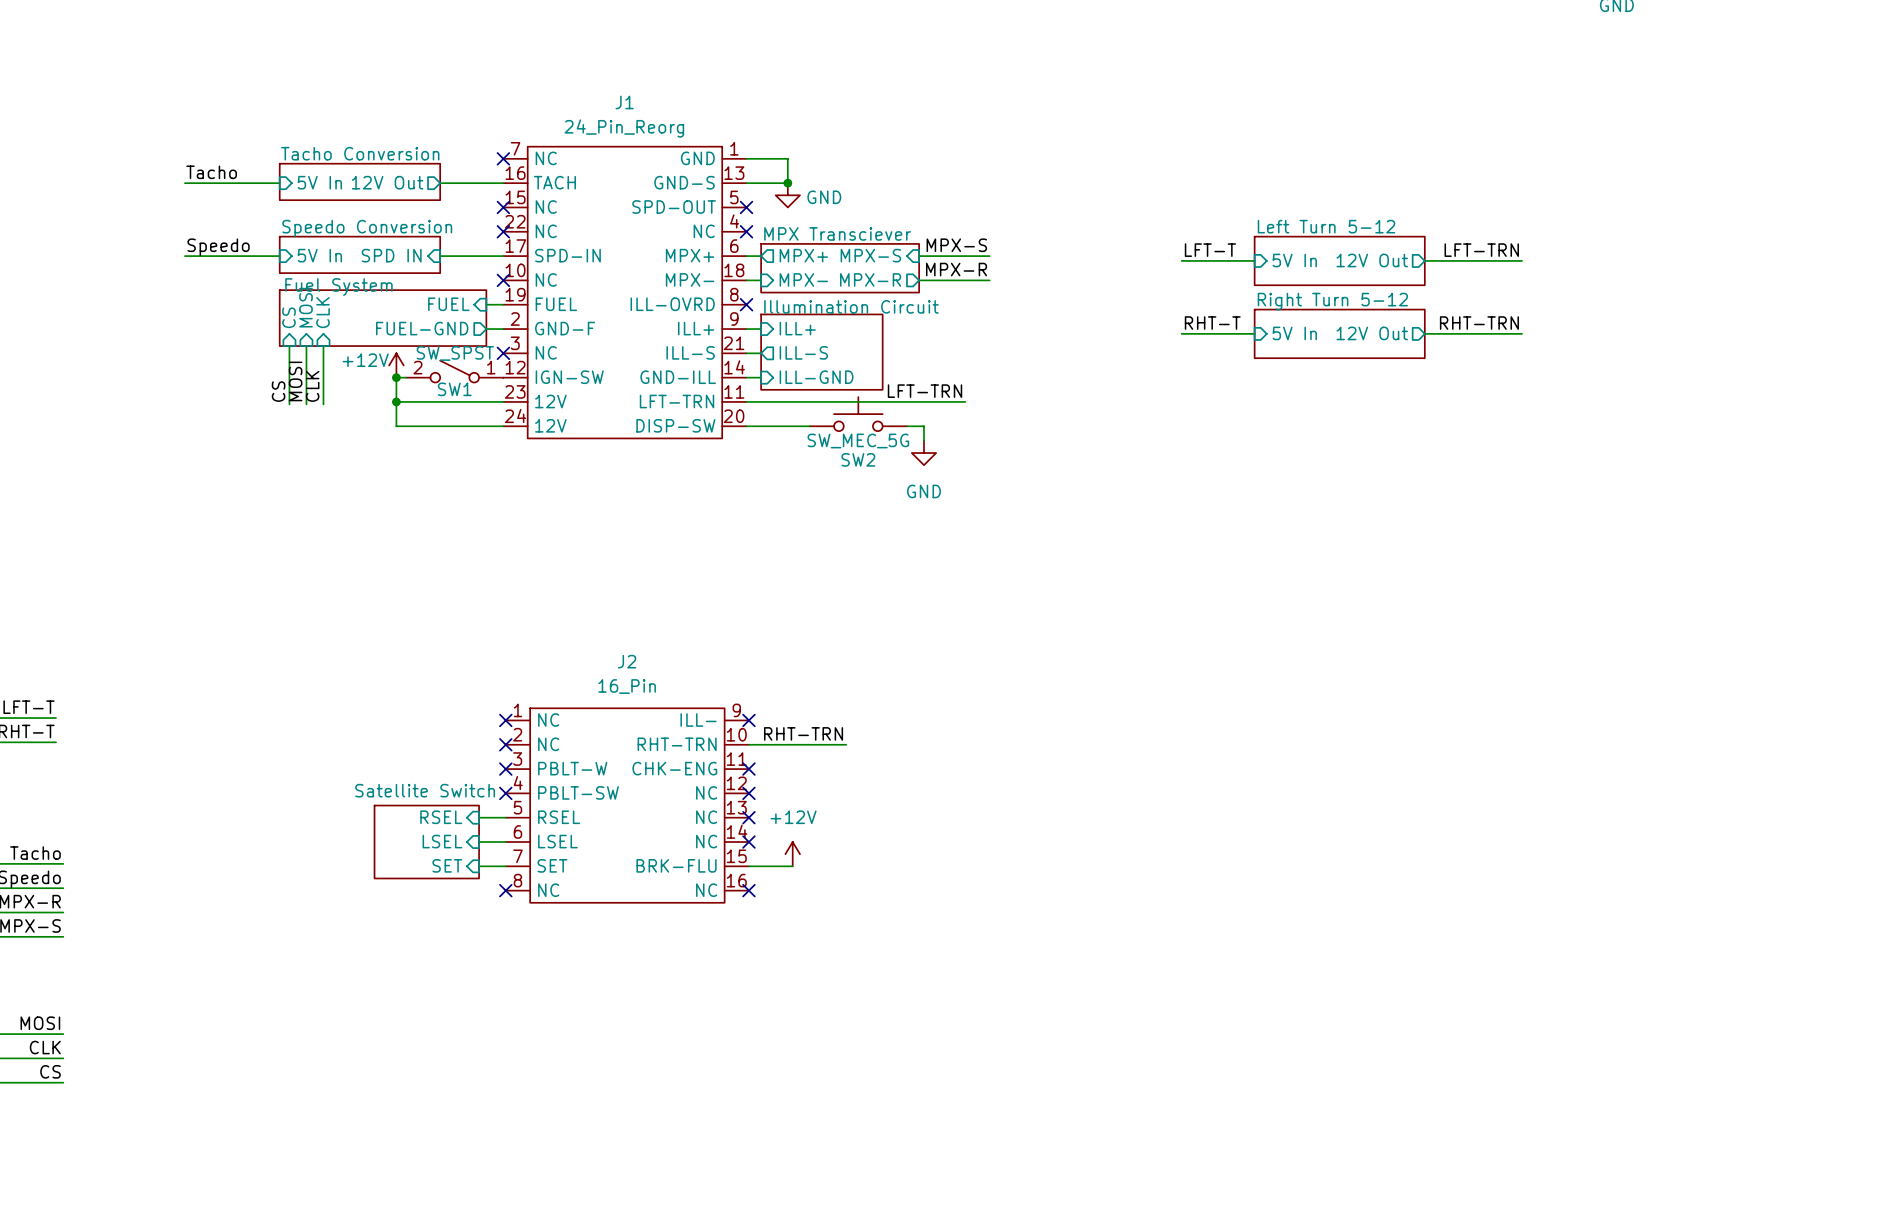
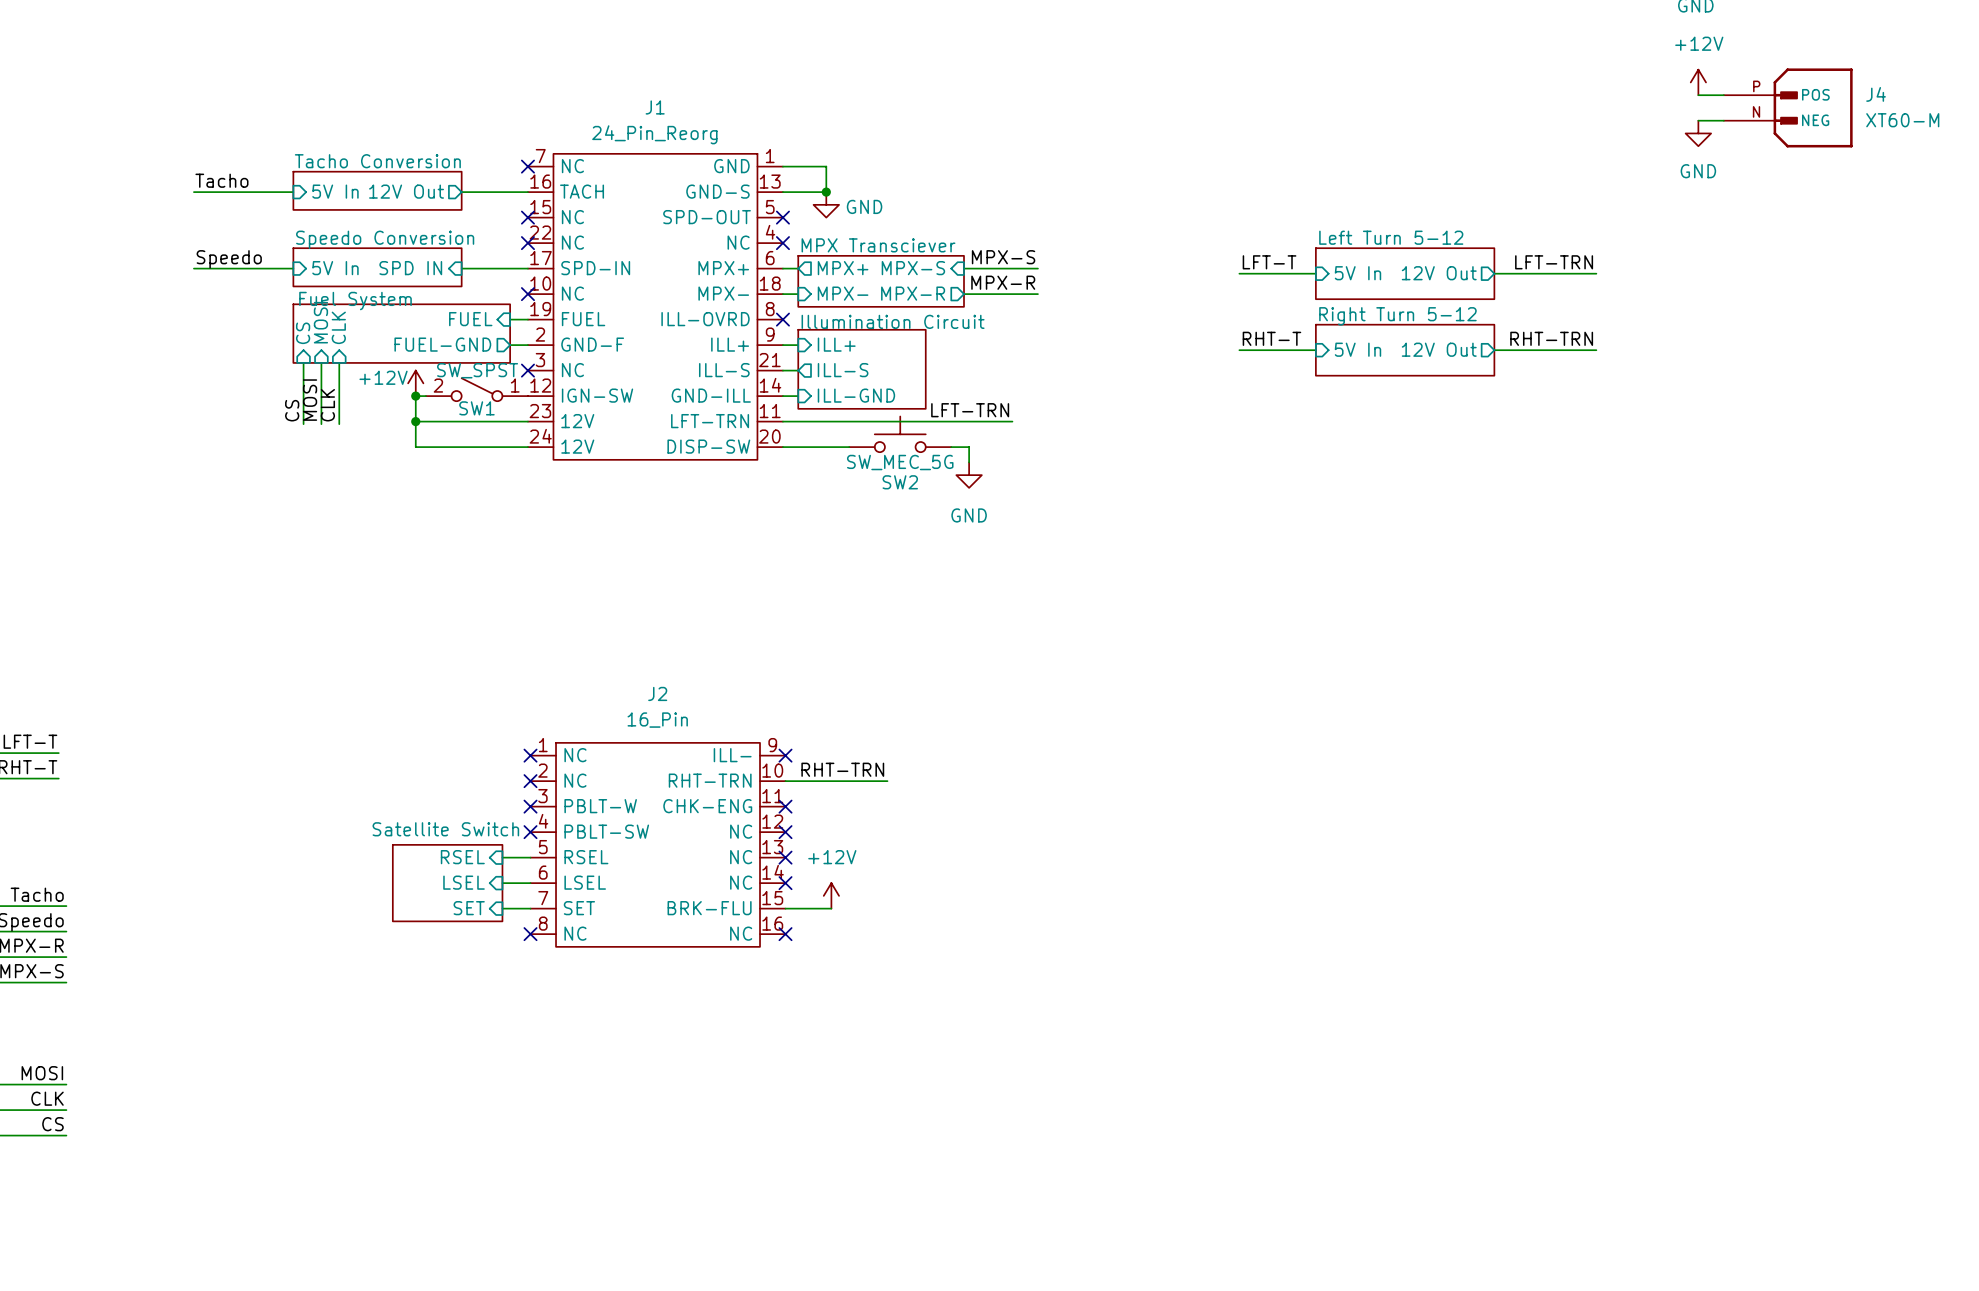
power symbol: none -> +12V (1698, 82)
wire: none -> (1698, 95) (1723, 95)
J4: none -> XT60-M (1788, 107)
wire: none -> (1698, 120) (1723, 120)
power symbol: none -> GND (1698, 133)

